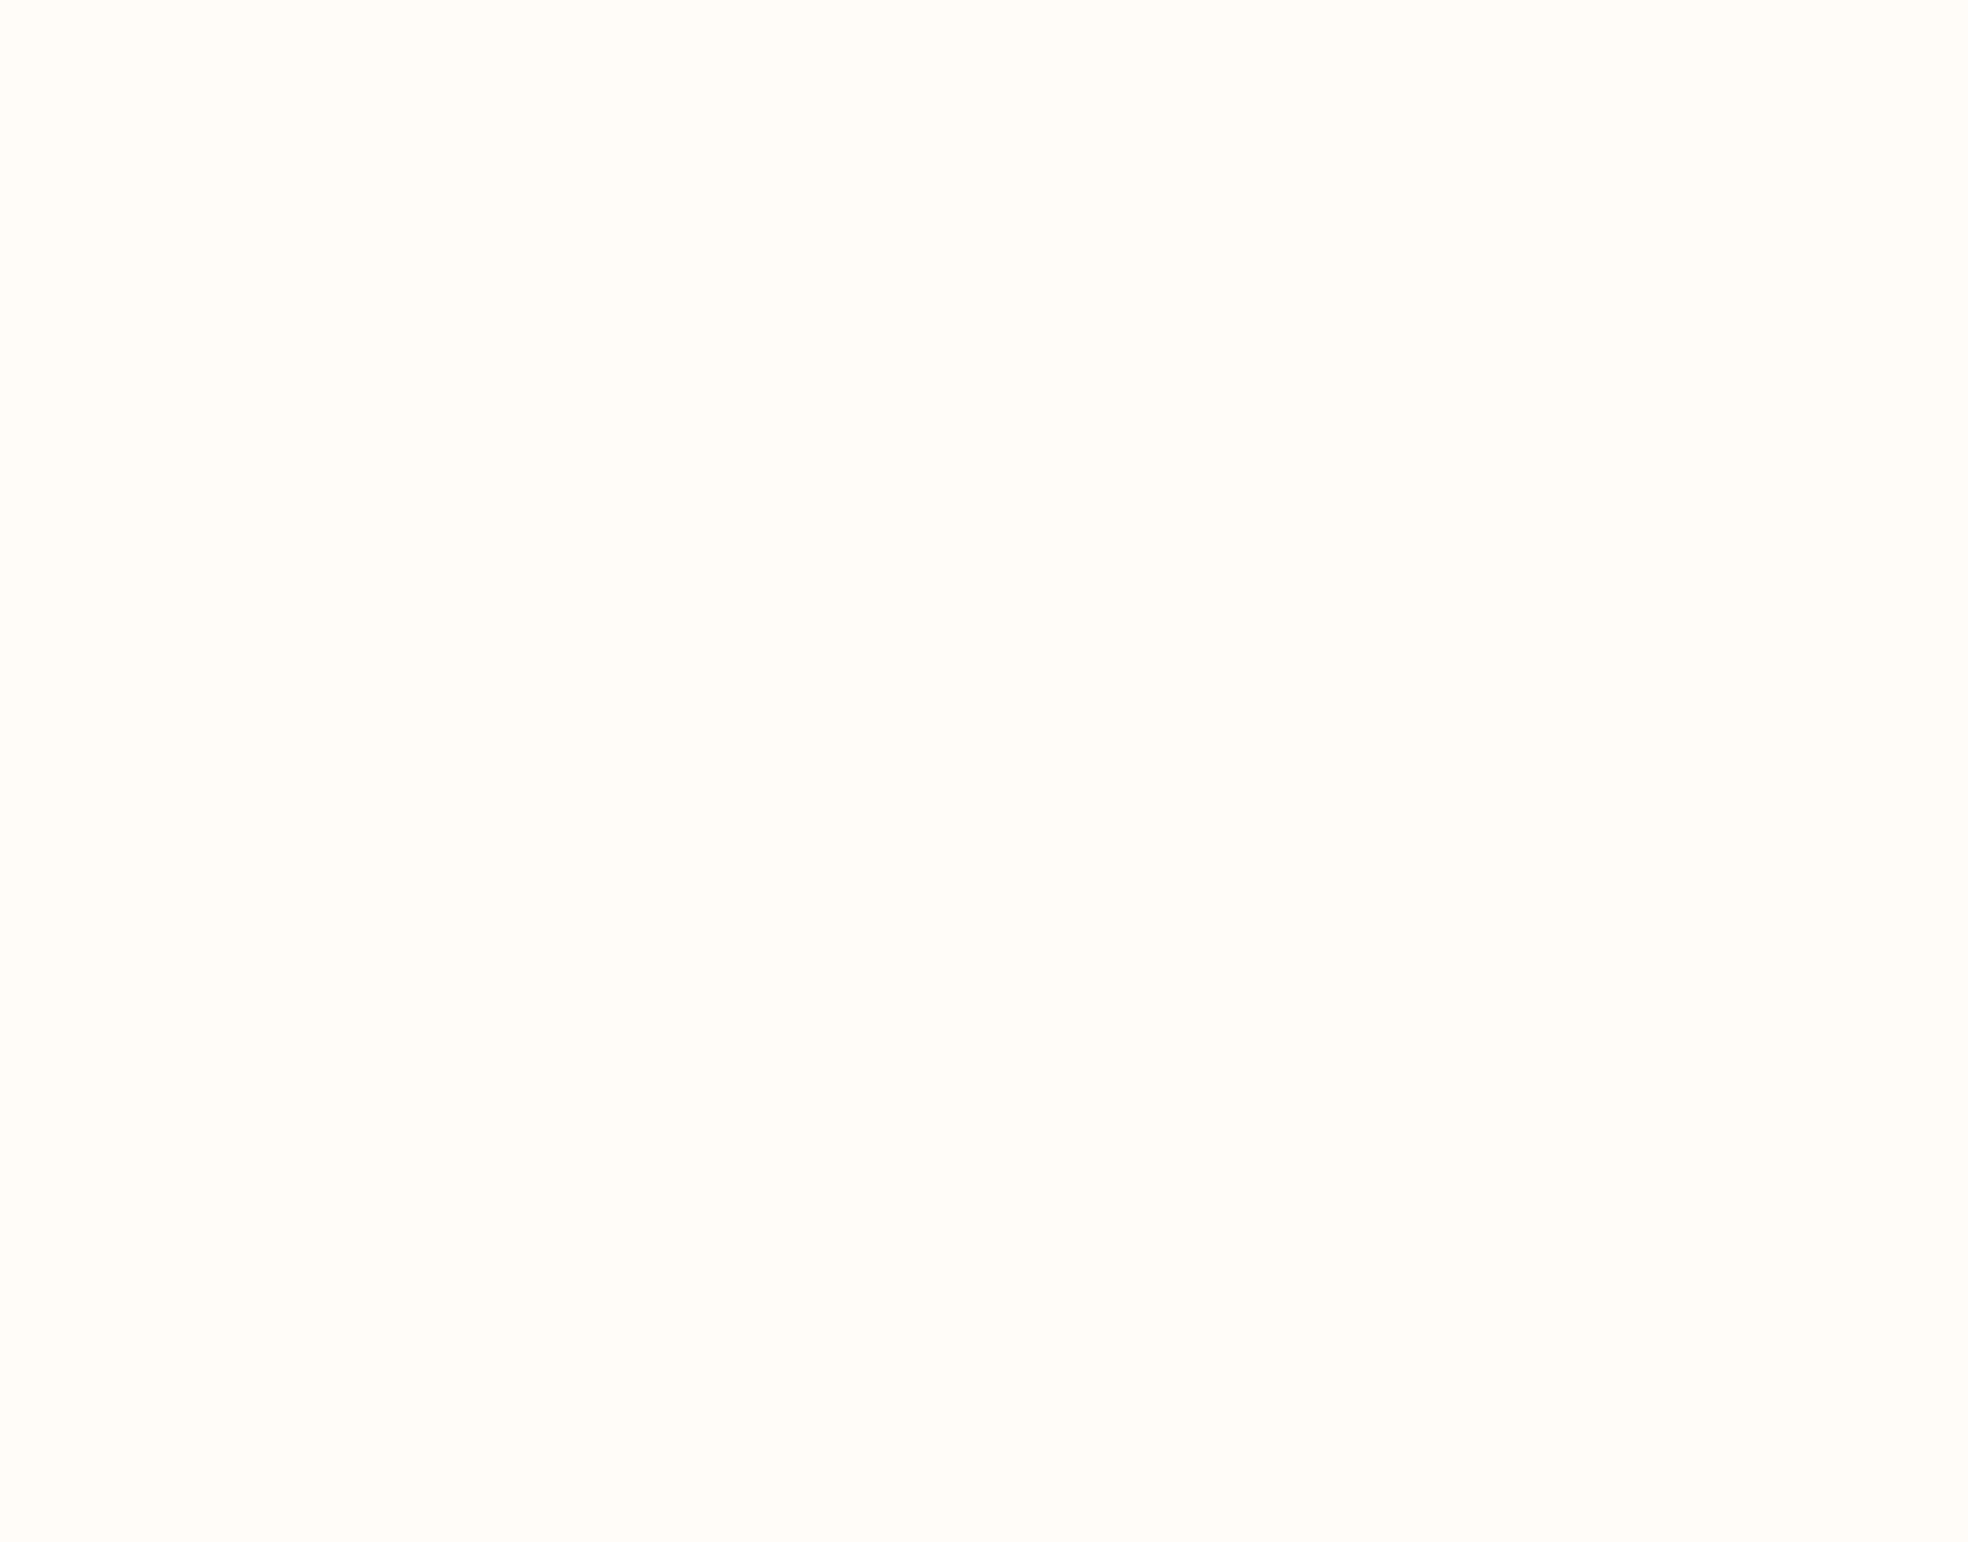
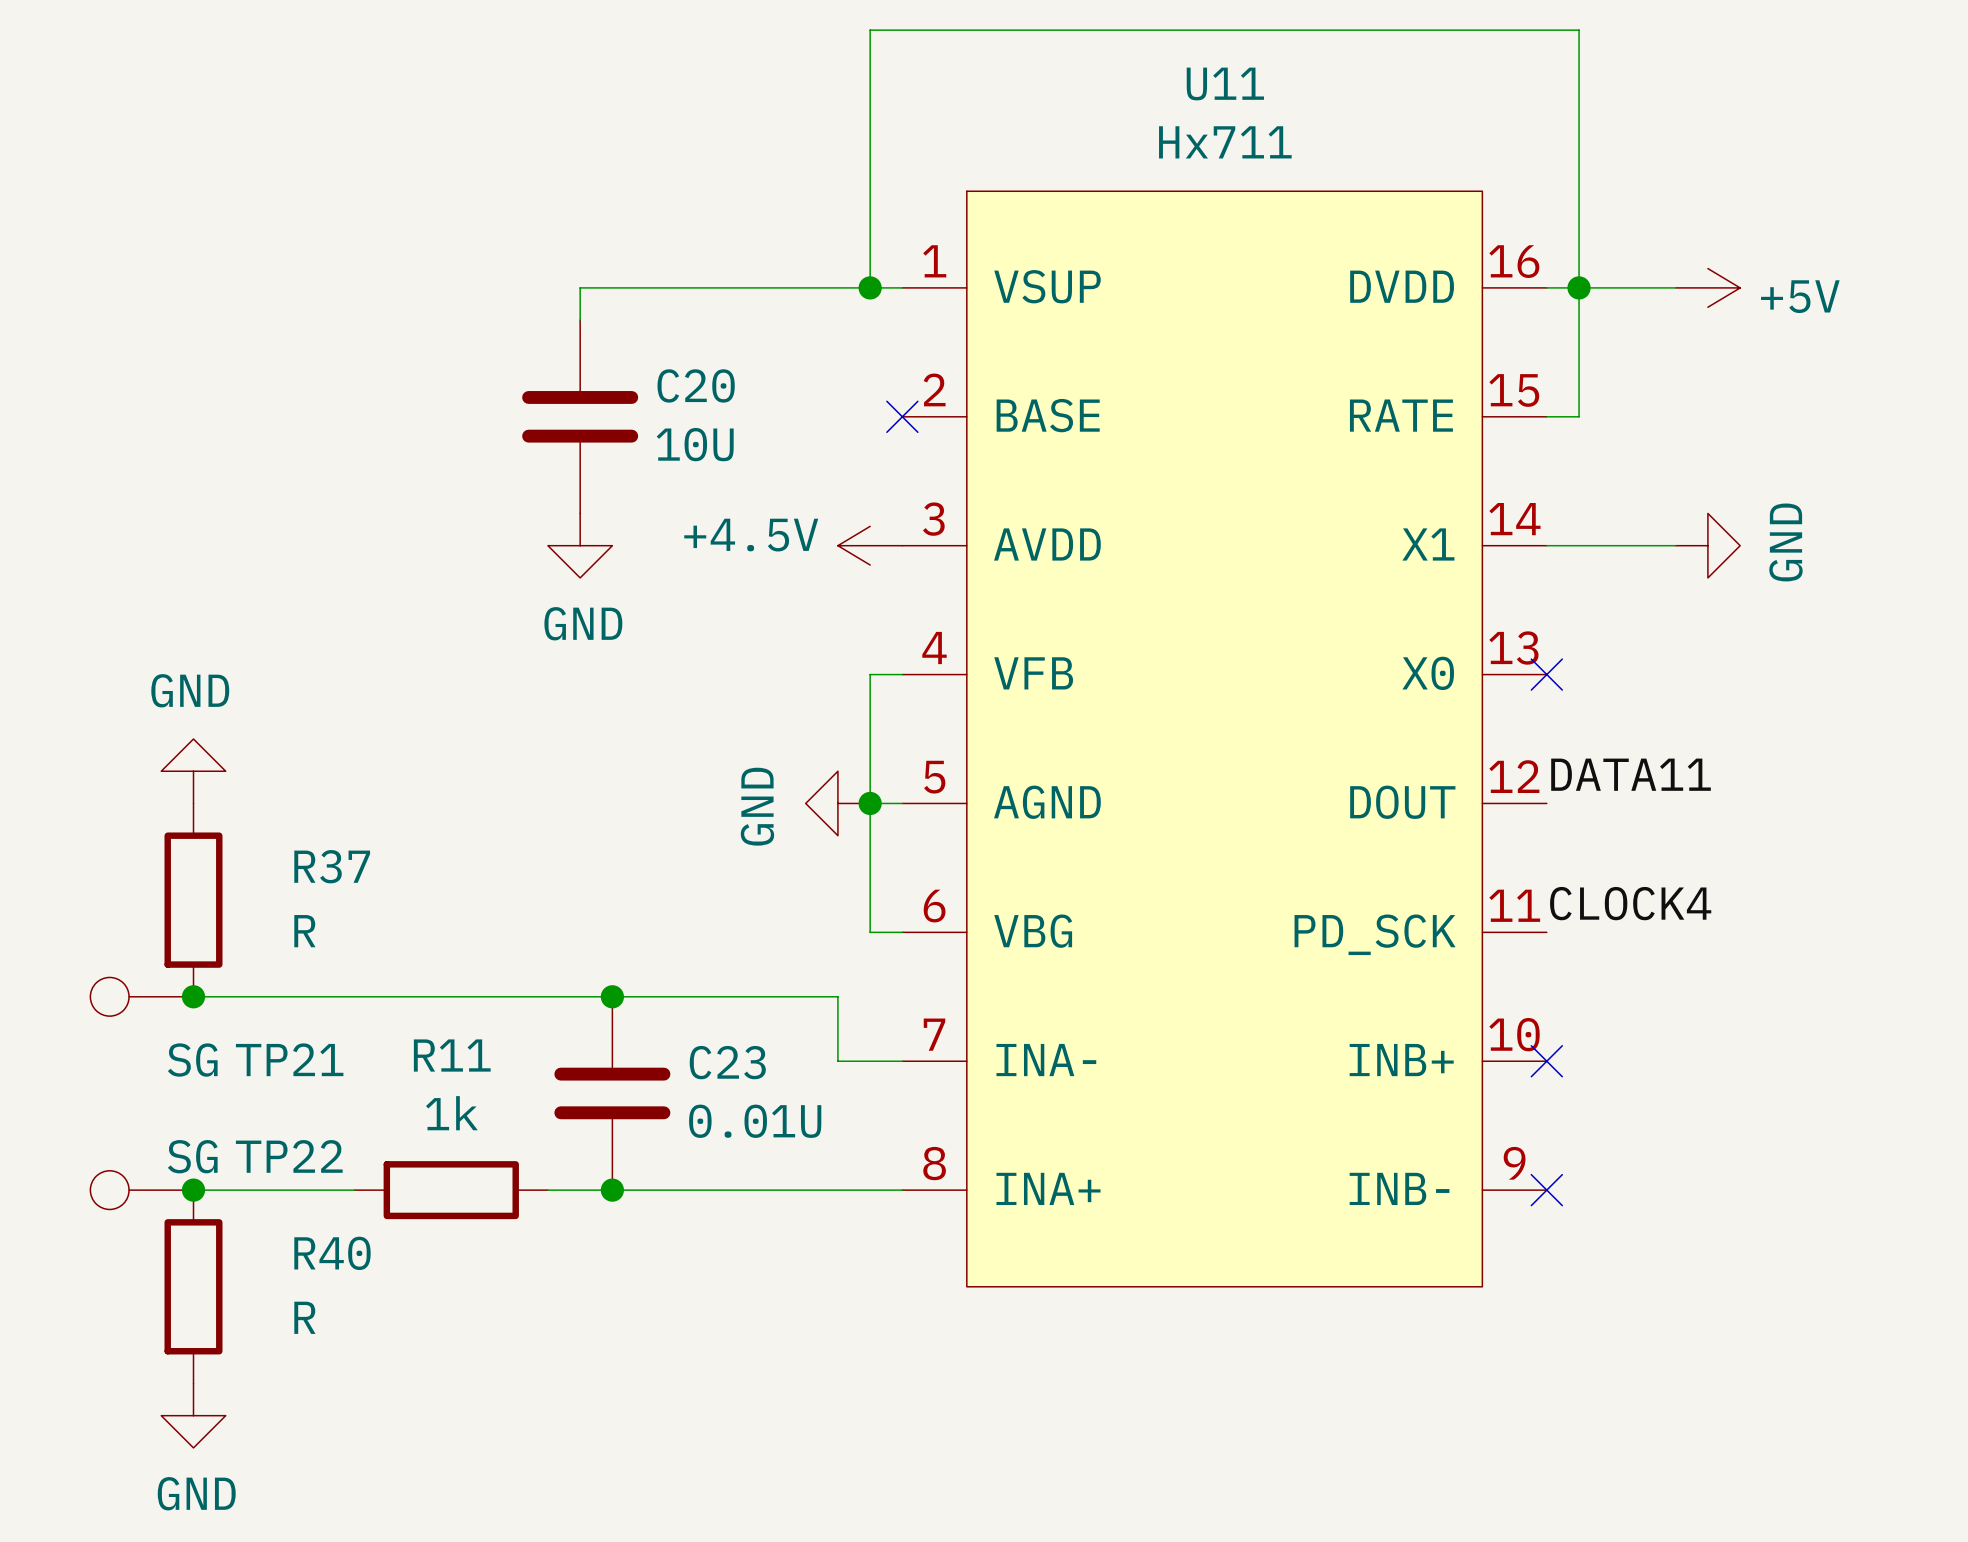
wire: none -> (870, 287) (870, 30) (1579, 30) (1579, 416) (1546, 416)
junction: none -> (870, 287)
wire: none -> (902, 287) (580, 287) (580, 320)
wire: none -> (1546, 287) (1675, 287)
junction: none -> (1579, 287)
power symbol: none -> +5V (1707, 287)
C20: none -> 10U (580, 416)
no-connect mark: none -> (902, 416)
power symbol: none -> GND (580, 545)
power symbol: none -> +4.5V (870, 545)
wire: none -> (1546, 545) (1675, 545)
power symbol: none -> GND (1707, 545)
wire: none -> (902, 674) (870, 674) (870, 932) (902, 932)
no-connect mark: none -> (1546, 674)
U11: none -> Hx711 (1224, 739)
power symbol: none -> GND (193, 771)
label: none -> DATA11 (1631, 774)
power symbol: none -> GND (837, 803)
wire: none -> (870, 803) (902, 803)
junction: none -> (870, 803)
R37: none -> R (193, 900)
label: none -> CLOCK4 (1630, 903)
TP21: none -> SG (141, 996)
wire: none -> (193, 996) (837, 996) (837, 1061) (902, 1061)
junction: none -> (193, 996)
junction: none -> (612, 996)
no-connect mark: none -> (1546, 1061)
C23: none -> 0.01U (612, 1093)
TP22: none -> SG (141, 1190)
wire: none -> (193, 1190) (354, 1190)
junction: none -> (193, 1190)
R11: none -> 1k (451, 1190)
wire: none -> (547, 1190) (902, 1190)
junction: none -> (612, 1190)
no-connect mark: none -> (1546, 1190)
R40: none -> R (193, 1286)
power symbol: none -> GND (193, 1415)

